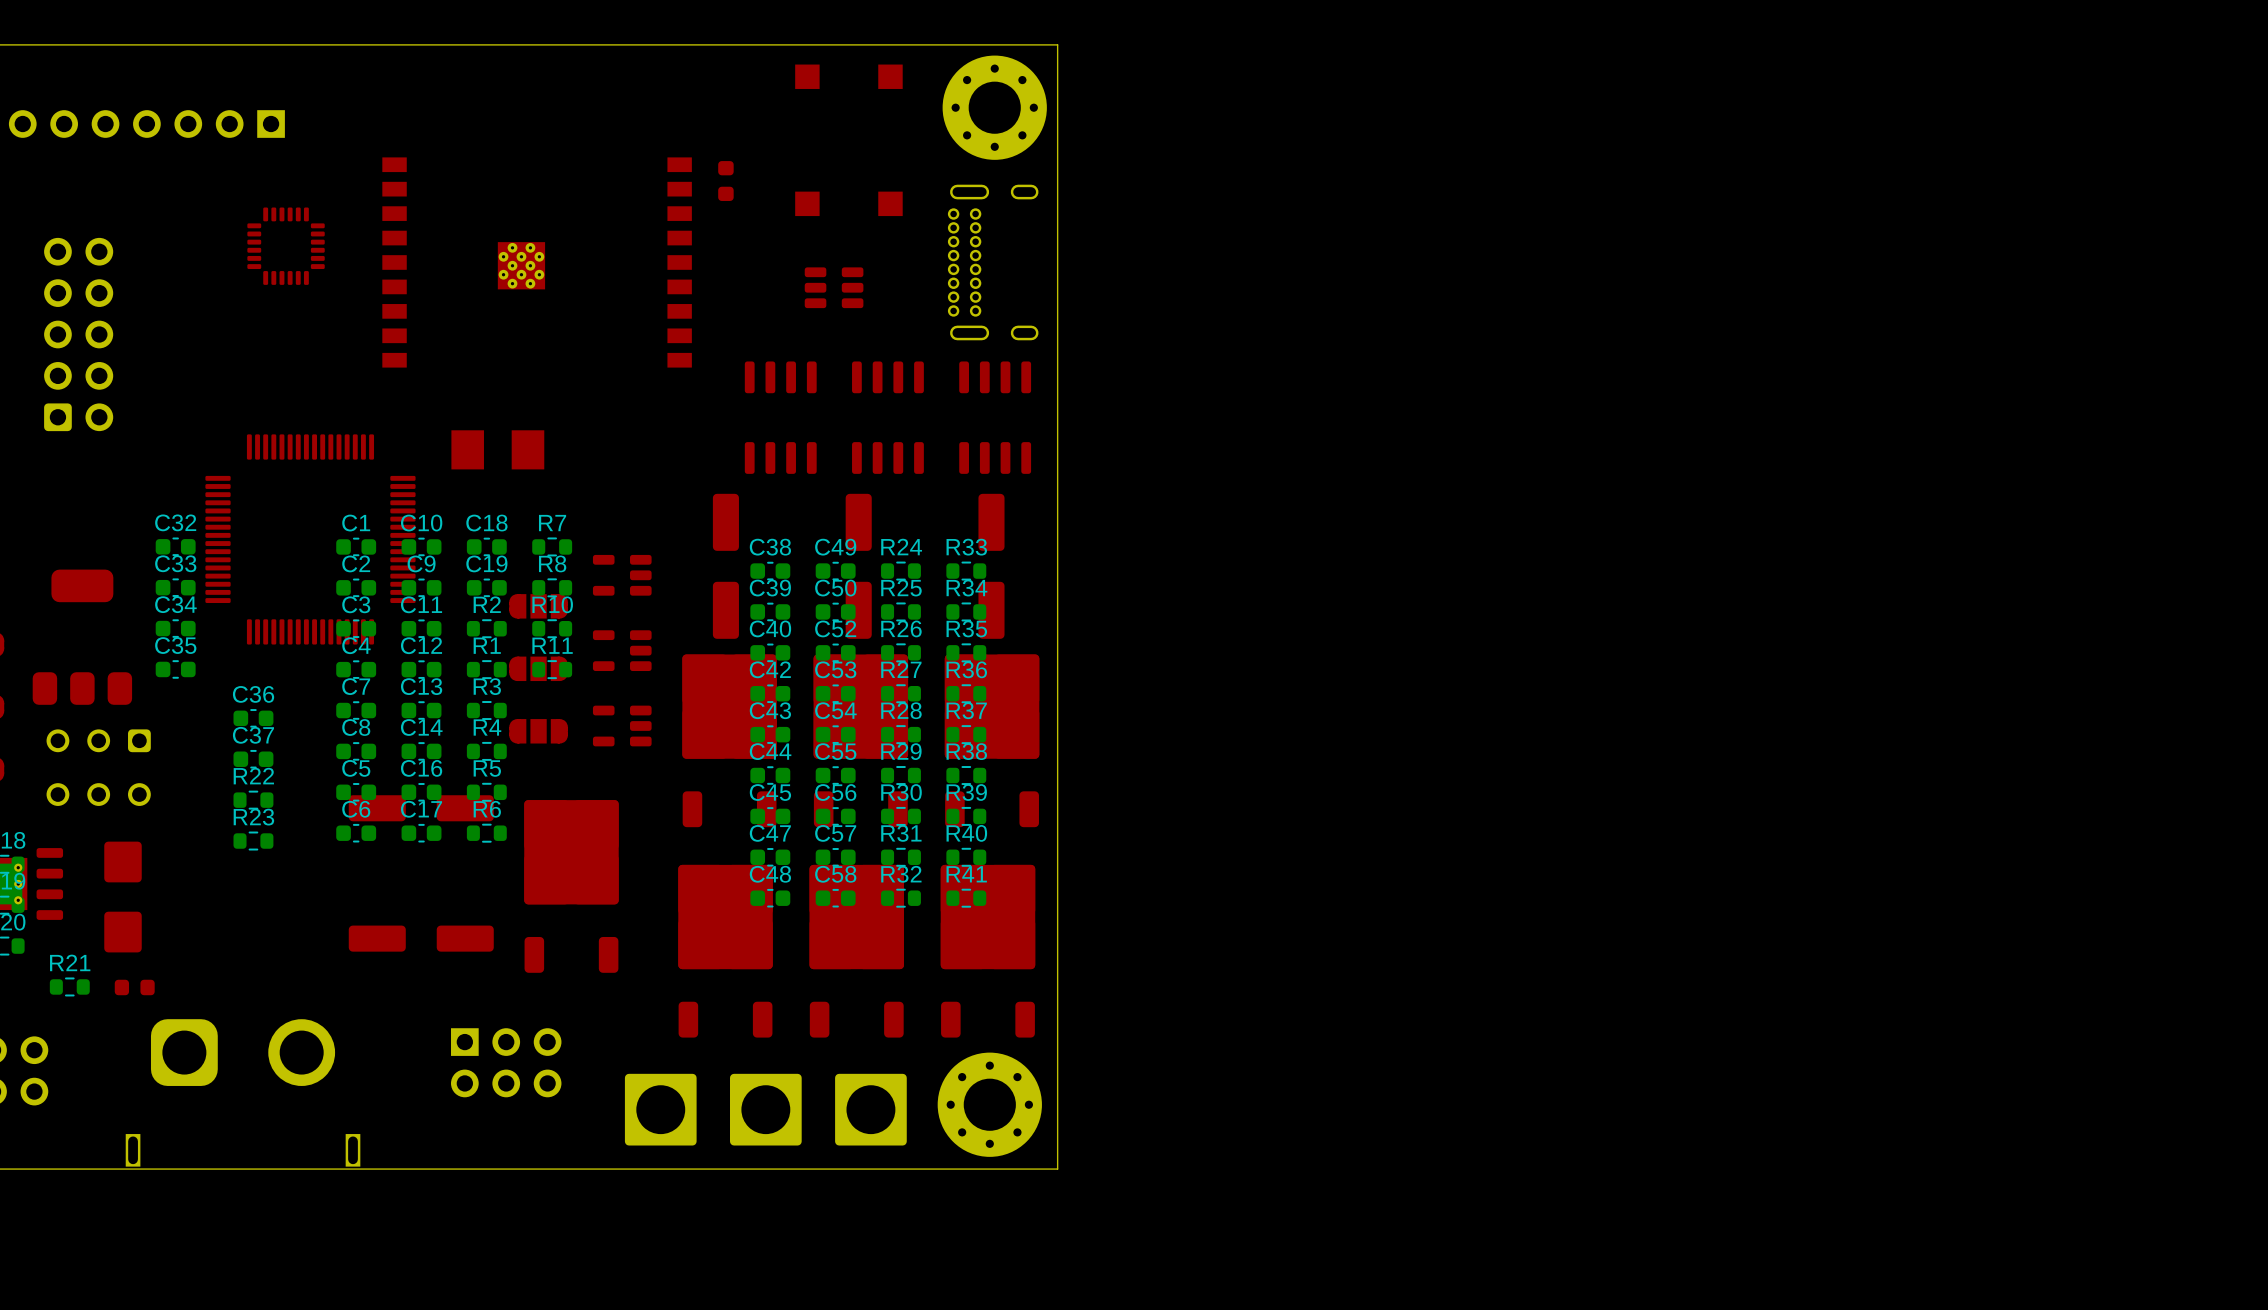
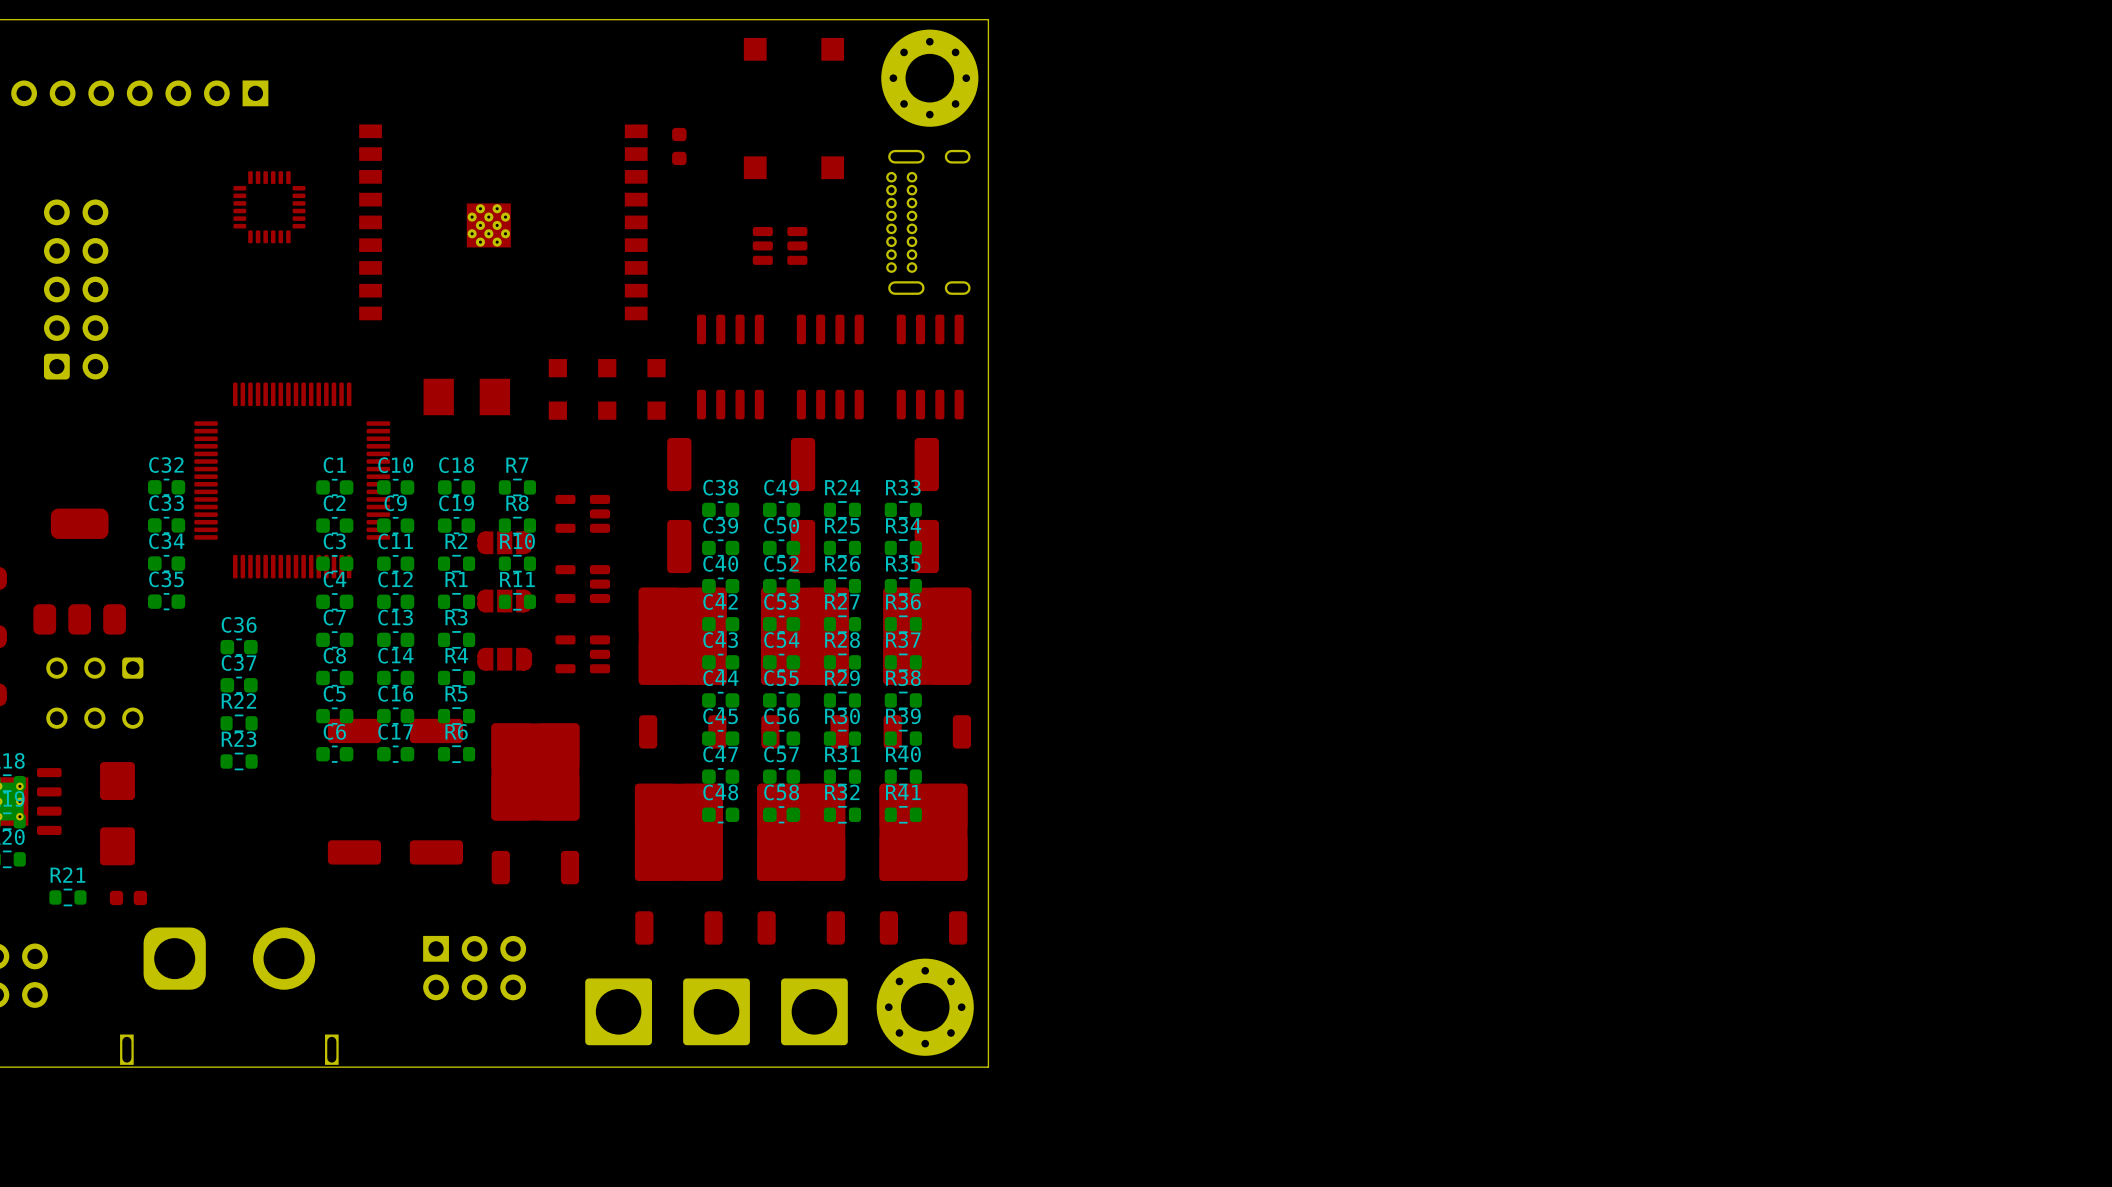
part: none -> (557, 389)
part: none -> (607, 389)
part: none -> (656, 389)

